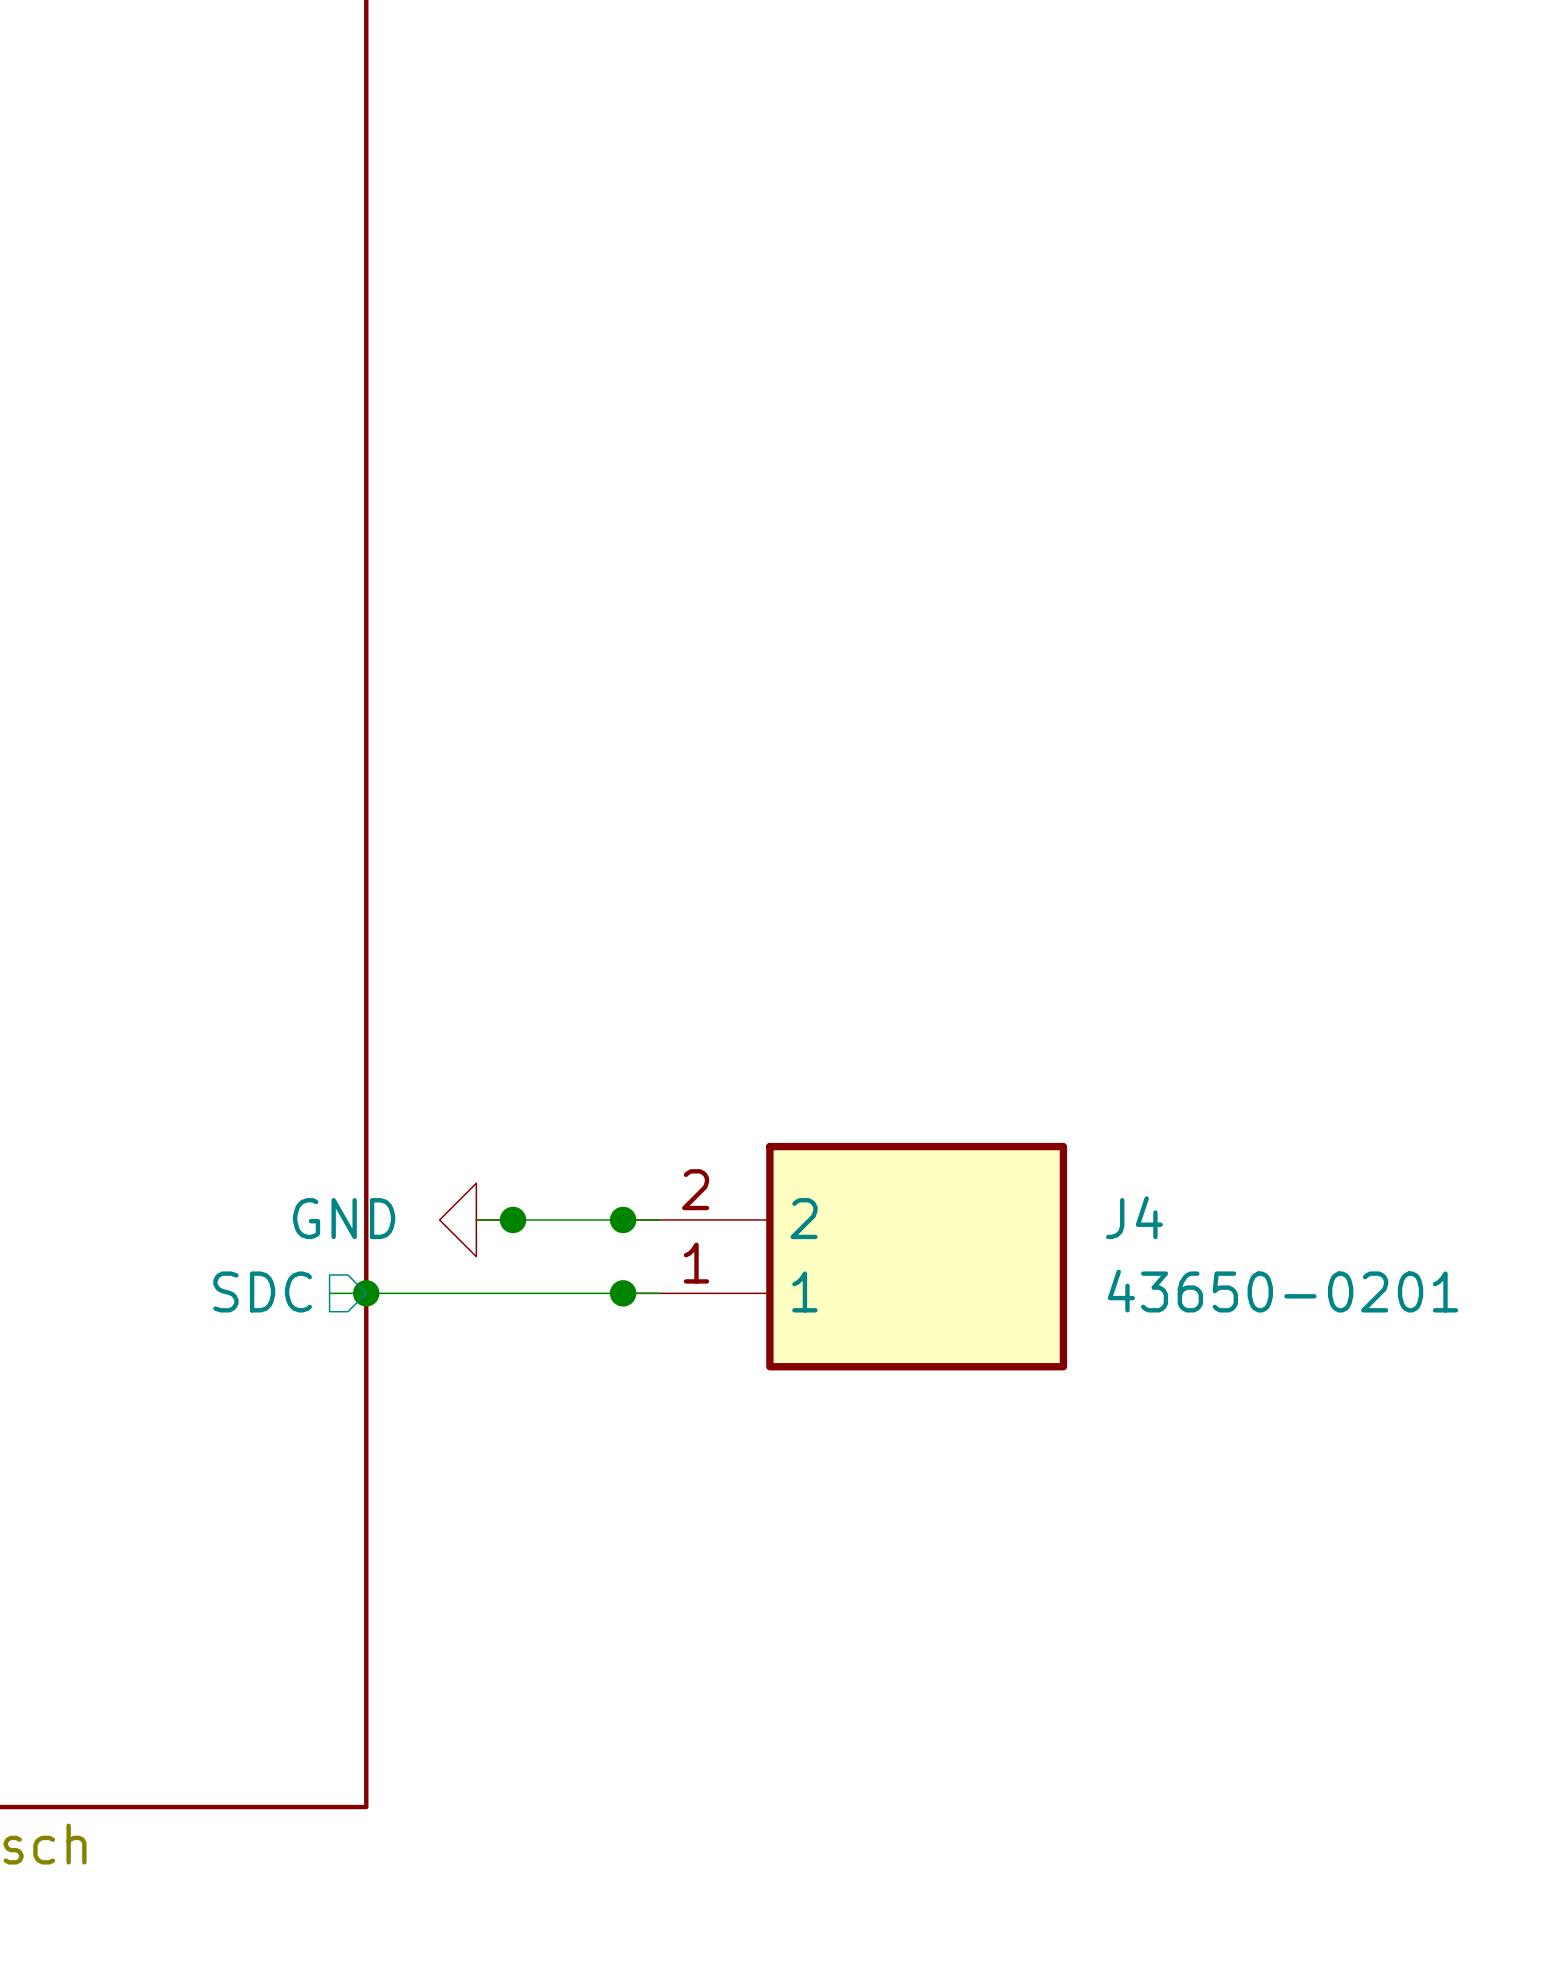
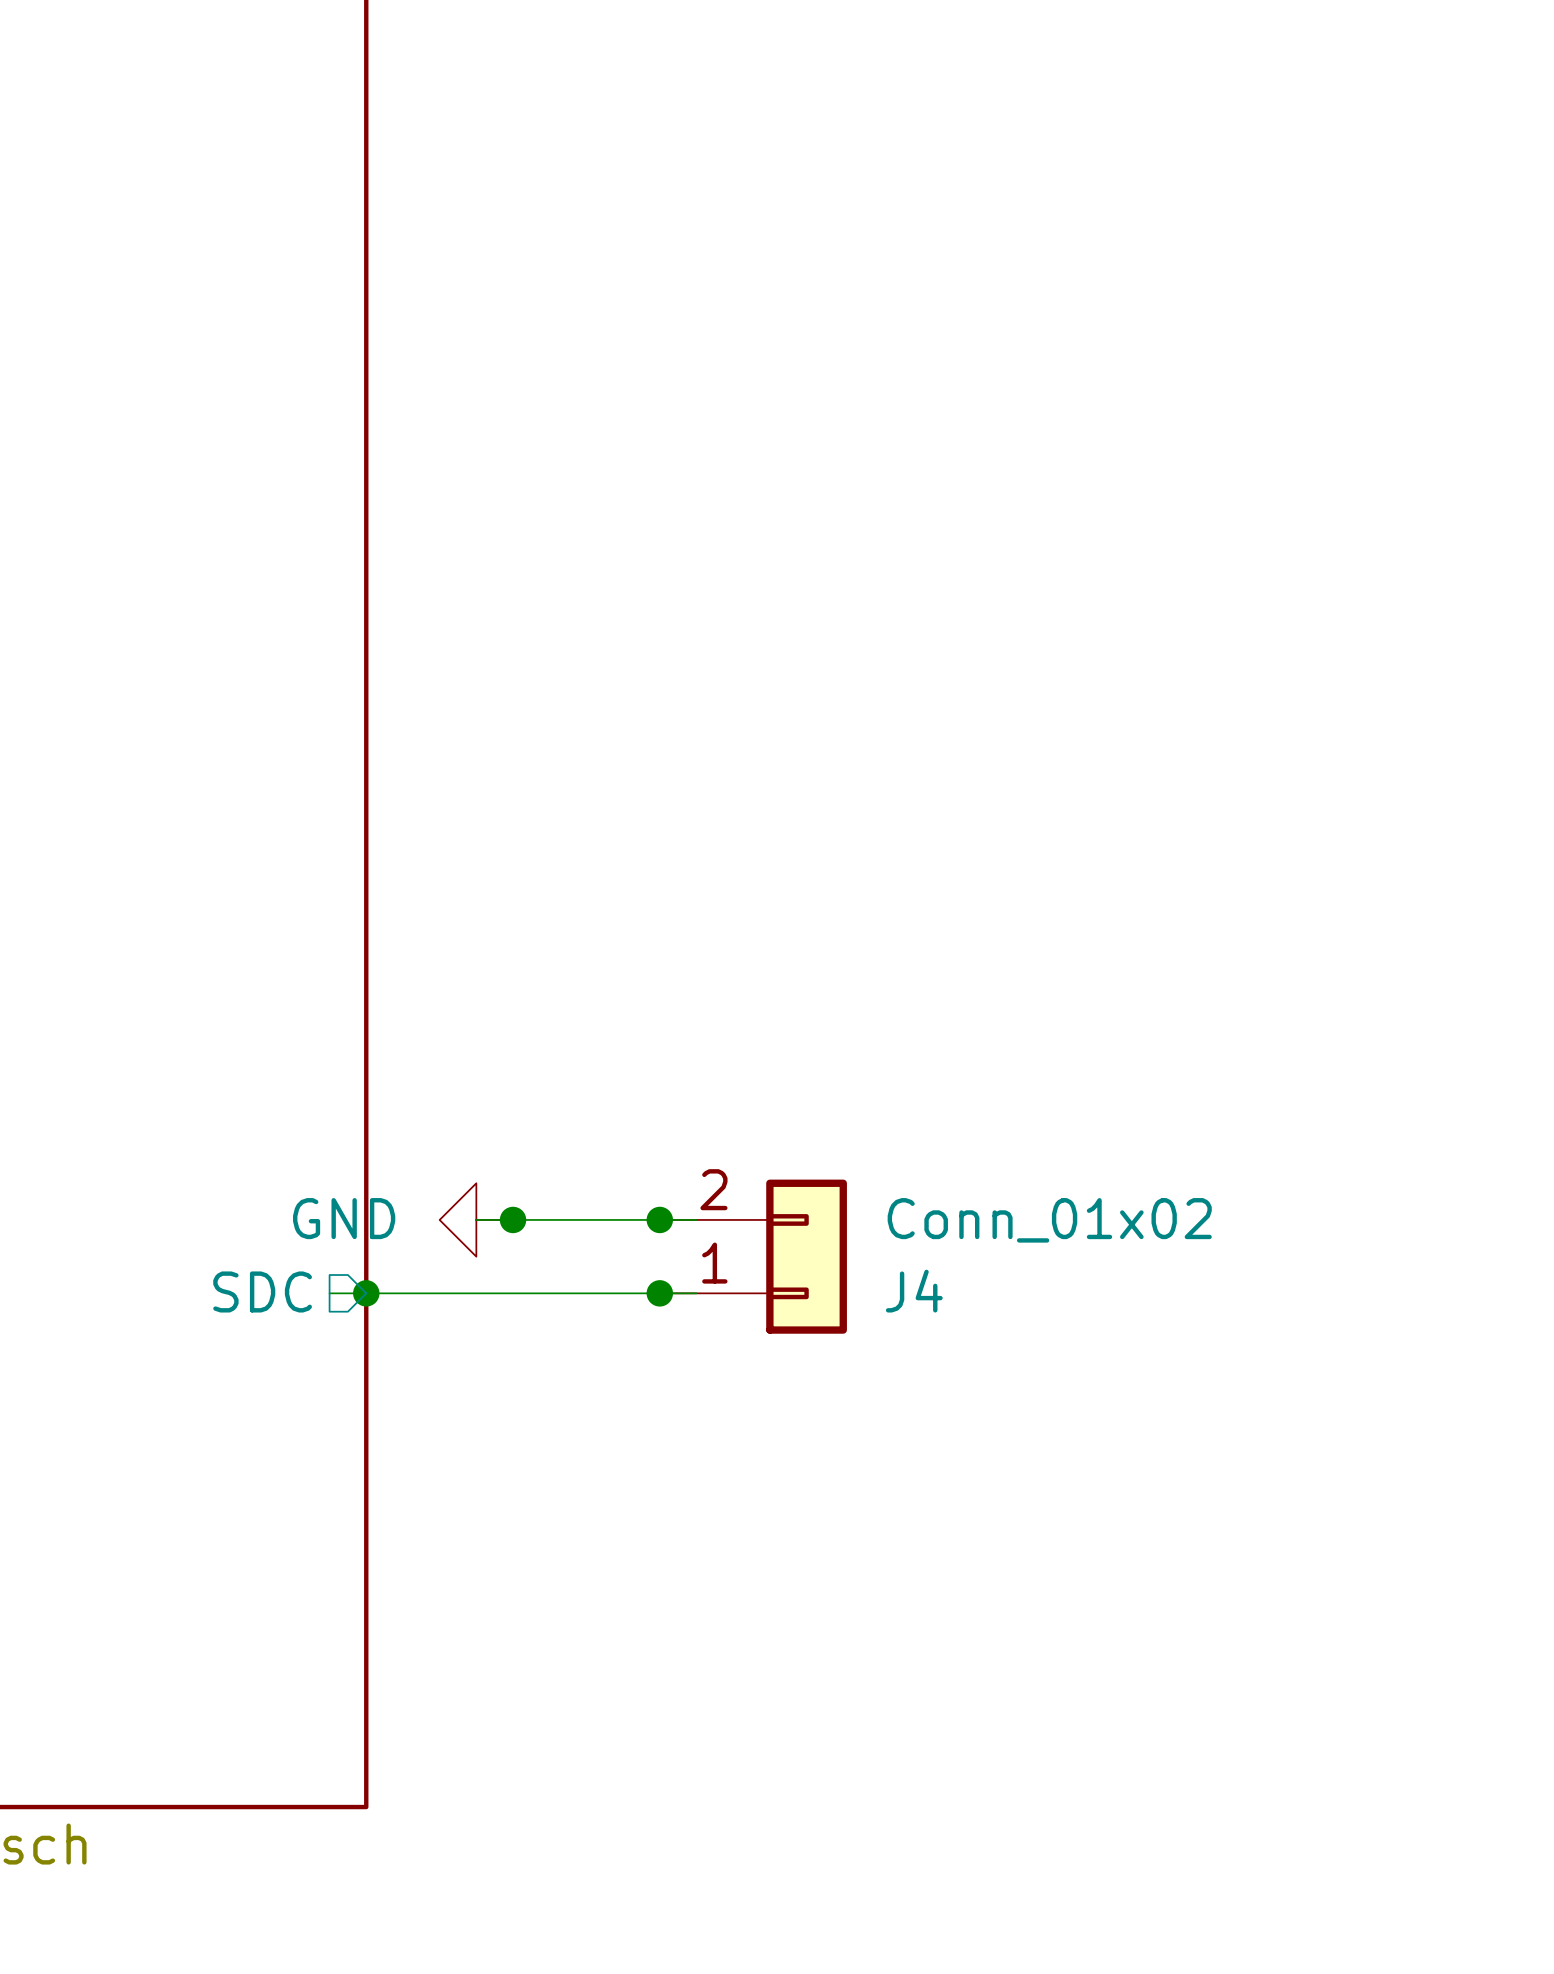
J4 symbol: [623, 1142, 1068, 1371] -> [659, 1179, 847, 1334]
J4 name position: J4 (1134, 1217) -> J4 (914, 1291)
junction position: (623, 1219) -> (659, 1219)
J4 value: 43650-0201 (1282, 1291) -> Conn_01x02 (1049, 1220)
junction position: (623, 1293) -> (659, 1293)

